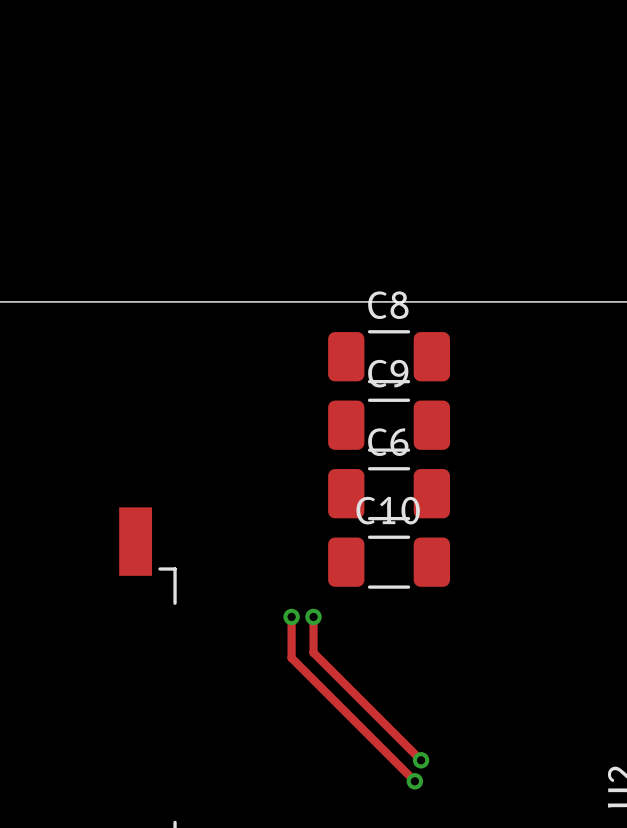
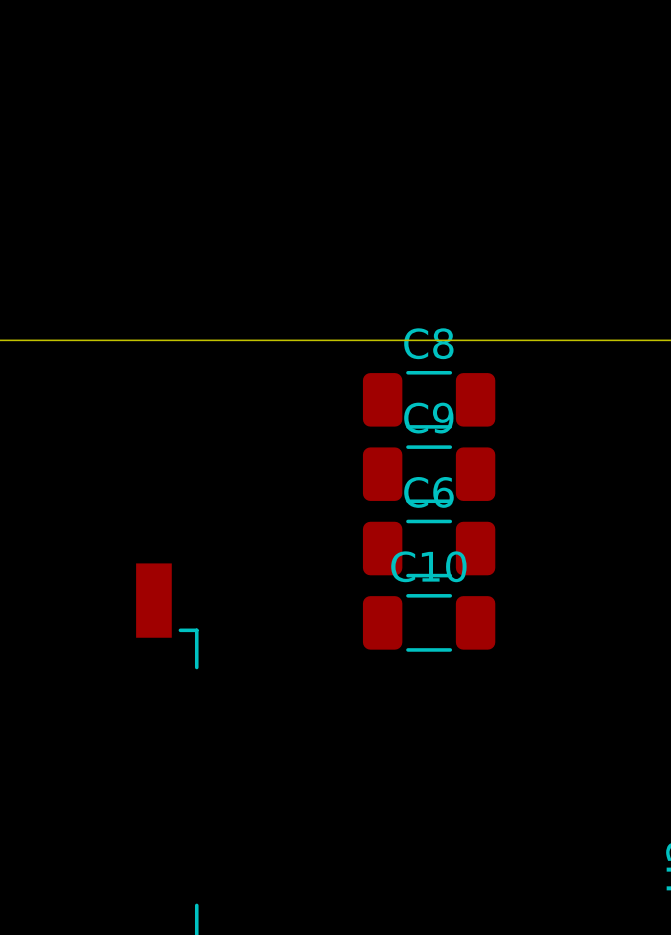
track: (291, 616) (291, 658) (414, 781) -> none
via: (291, 616) -> none
track: (313, 616) (313, 652) (421, 760) -> none
via: (313, 616) -> none
via: (421, 760) -> none
via: (414, 781) -> none

